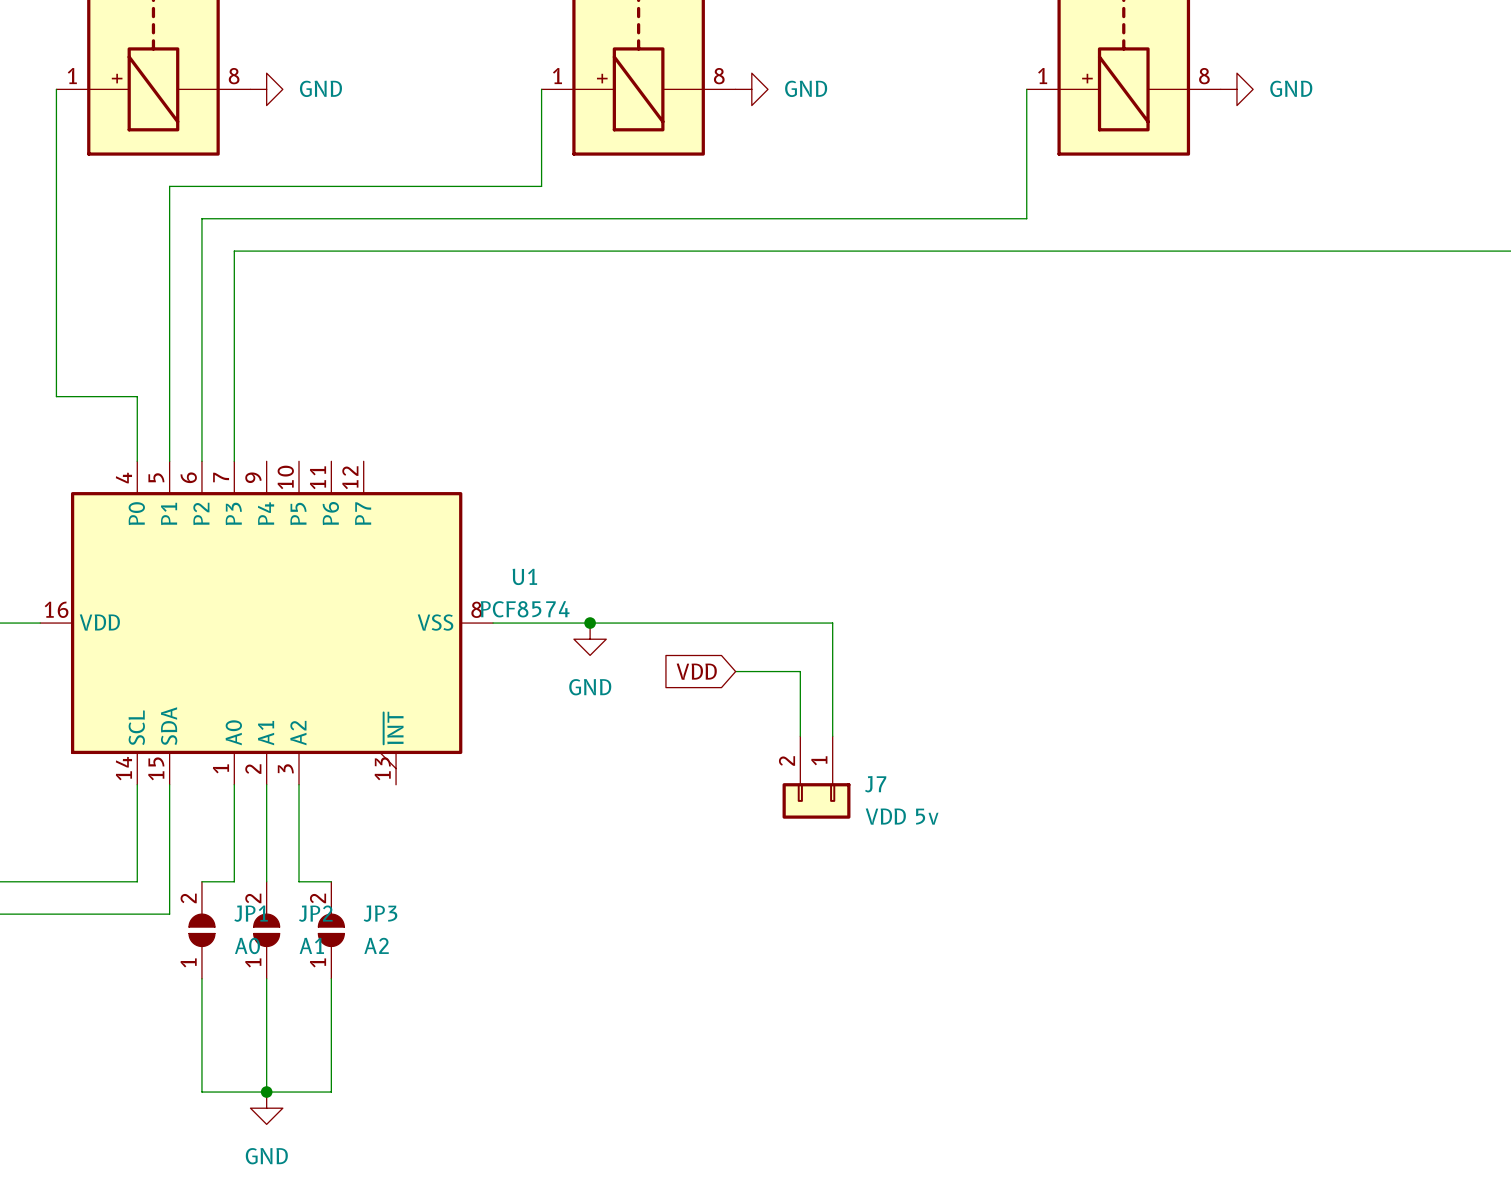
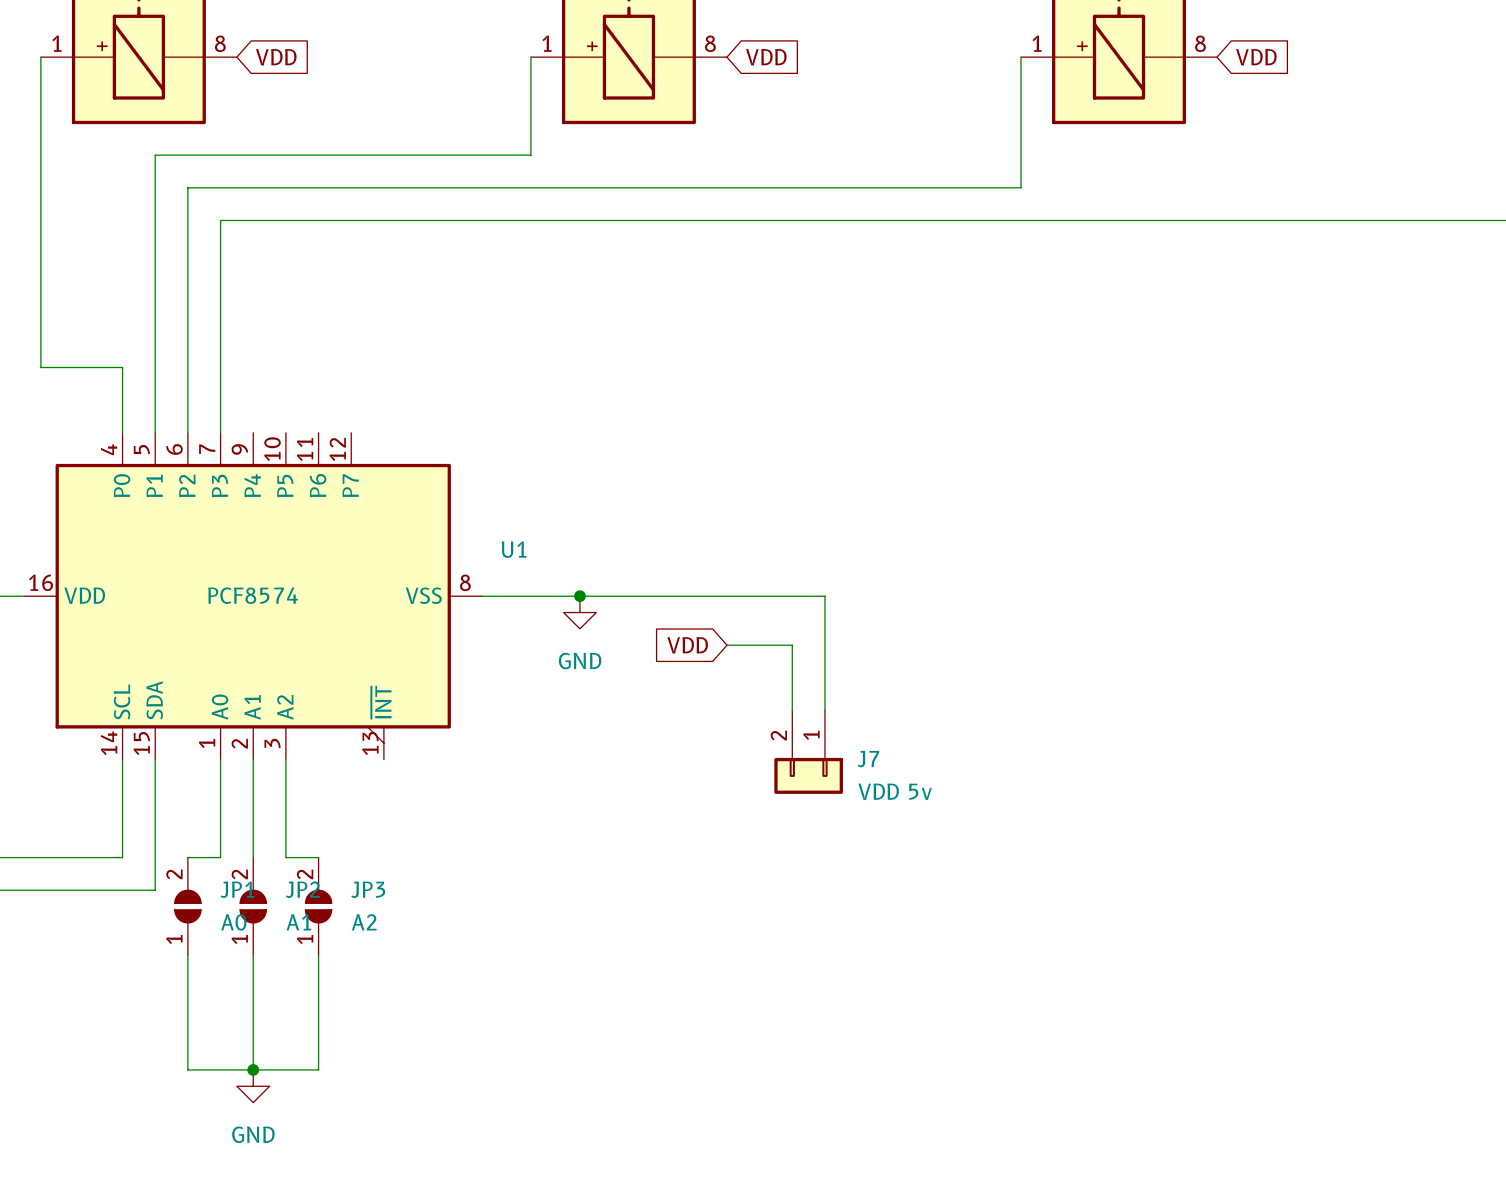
power symbol: GND (266, 89) -> none
global label: none -> VDD (276, 57)
power symbol: GND (751, 89) -> none
global label: none -> VDD (766, 57)
power symbol: GND (1236, 89) -> none
global label: none -> VDD (1256, 57)
U1 value position: PCF8574 (525, 609) -> PCF8574 (252, 595)

